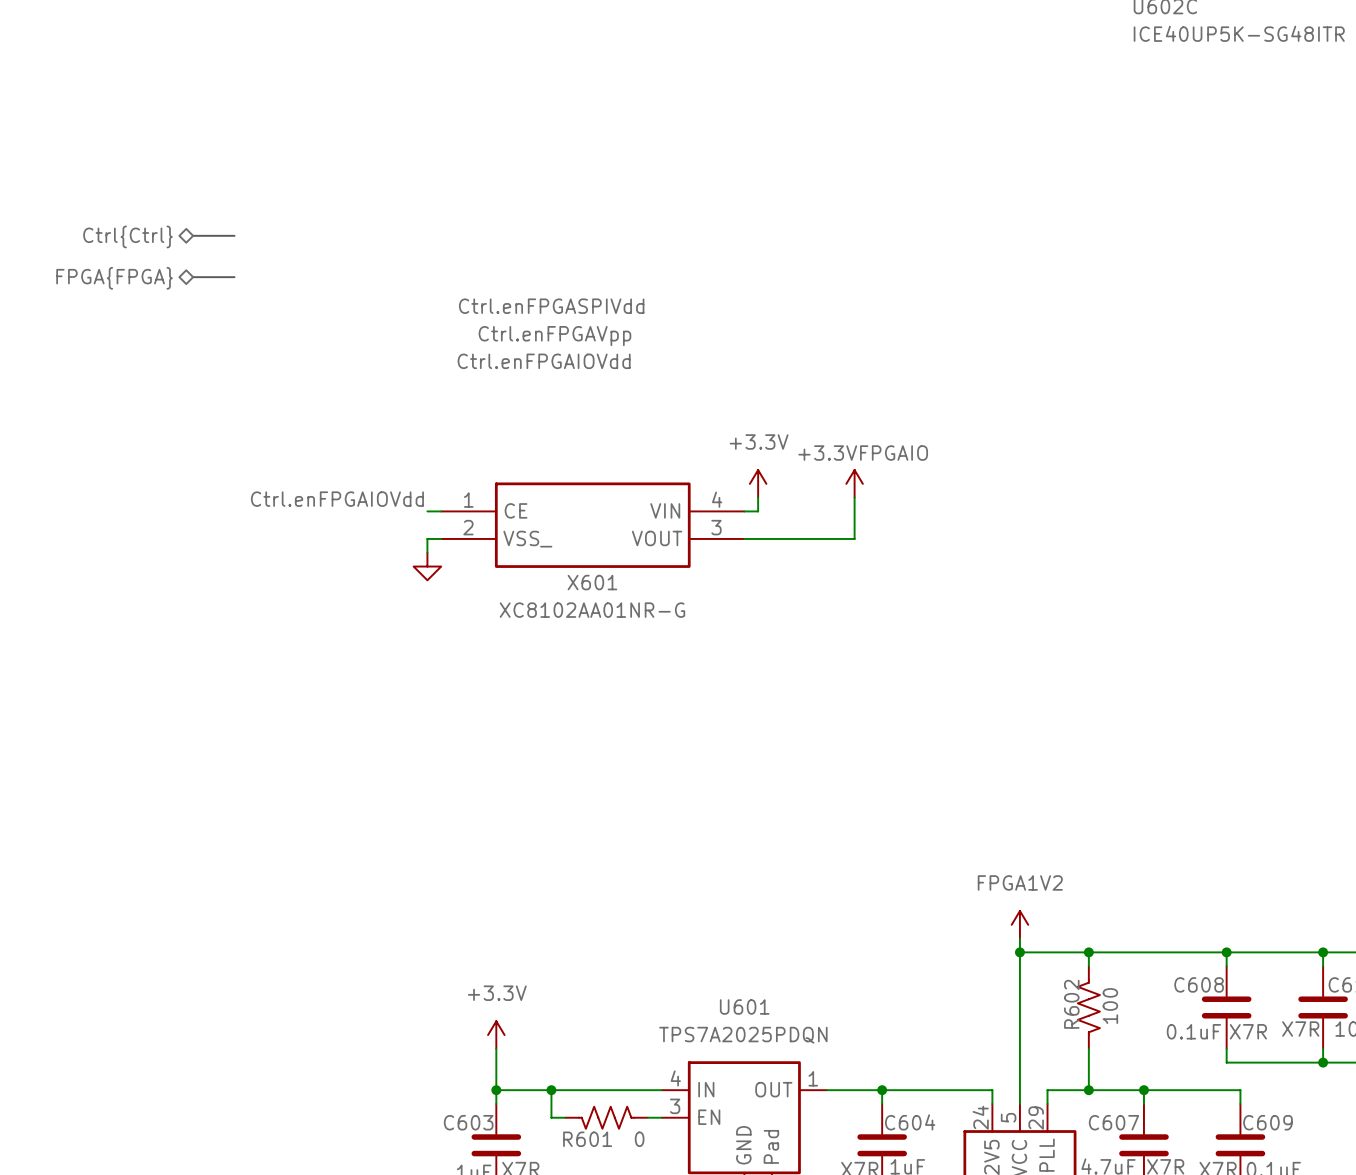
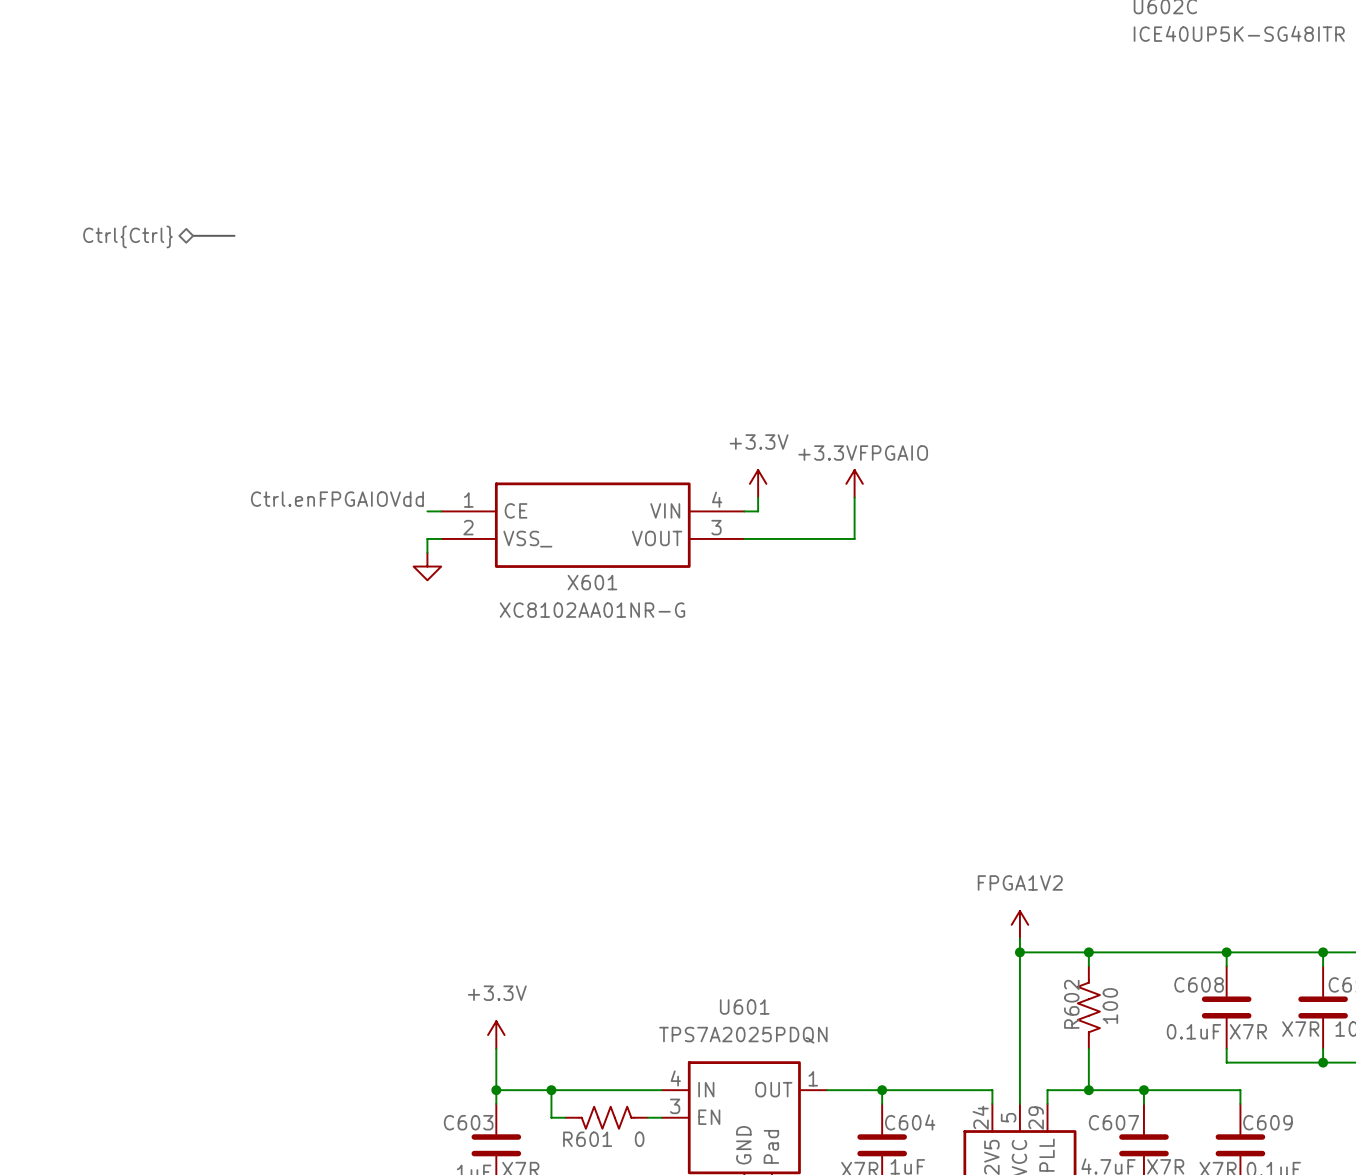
bus: (193, 277) (234, 277) -> none
hierarchical label: FPGA{FPGA} (114, 278) -> none
label: Ctrl.enFPGASPIVdd (551, 306) -> none
label: Ctrl.enFPGAVpp (554, 336) -> none
label: Ctrl.enFPGAIOVdd (544, 361) -> none

